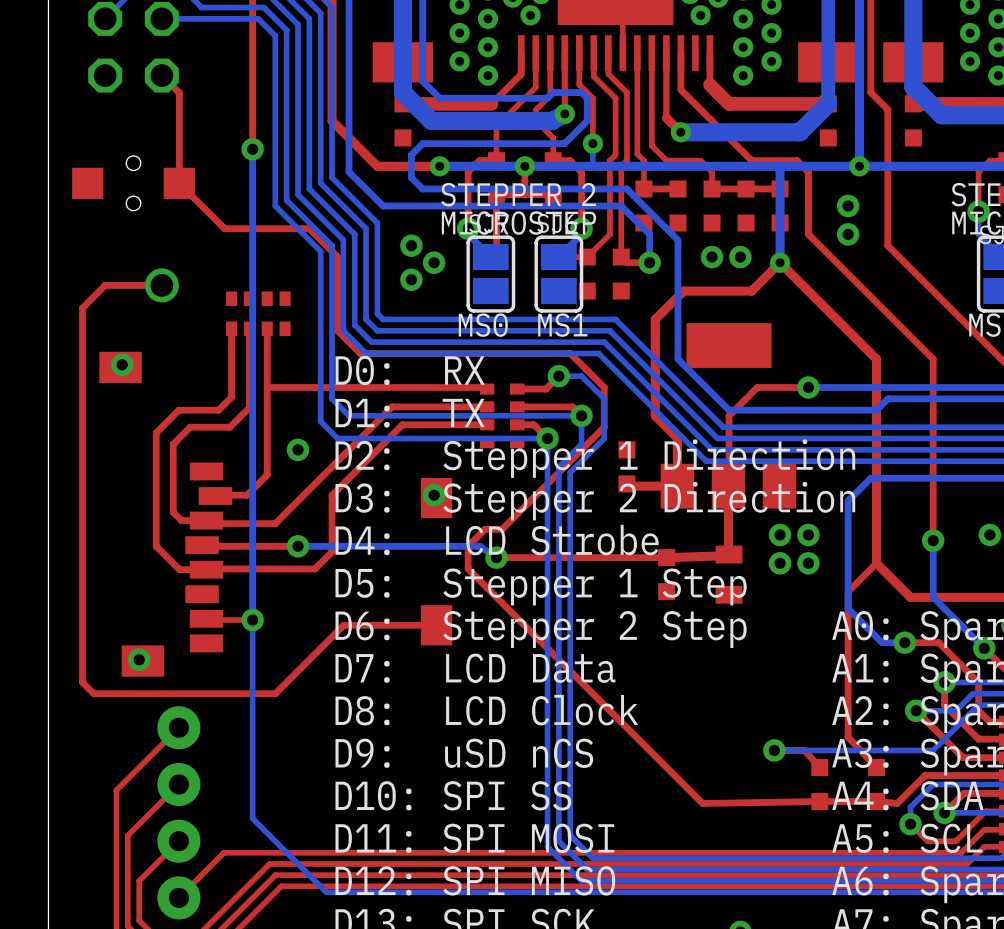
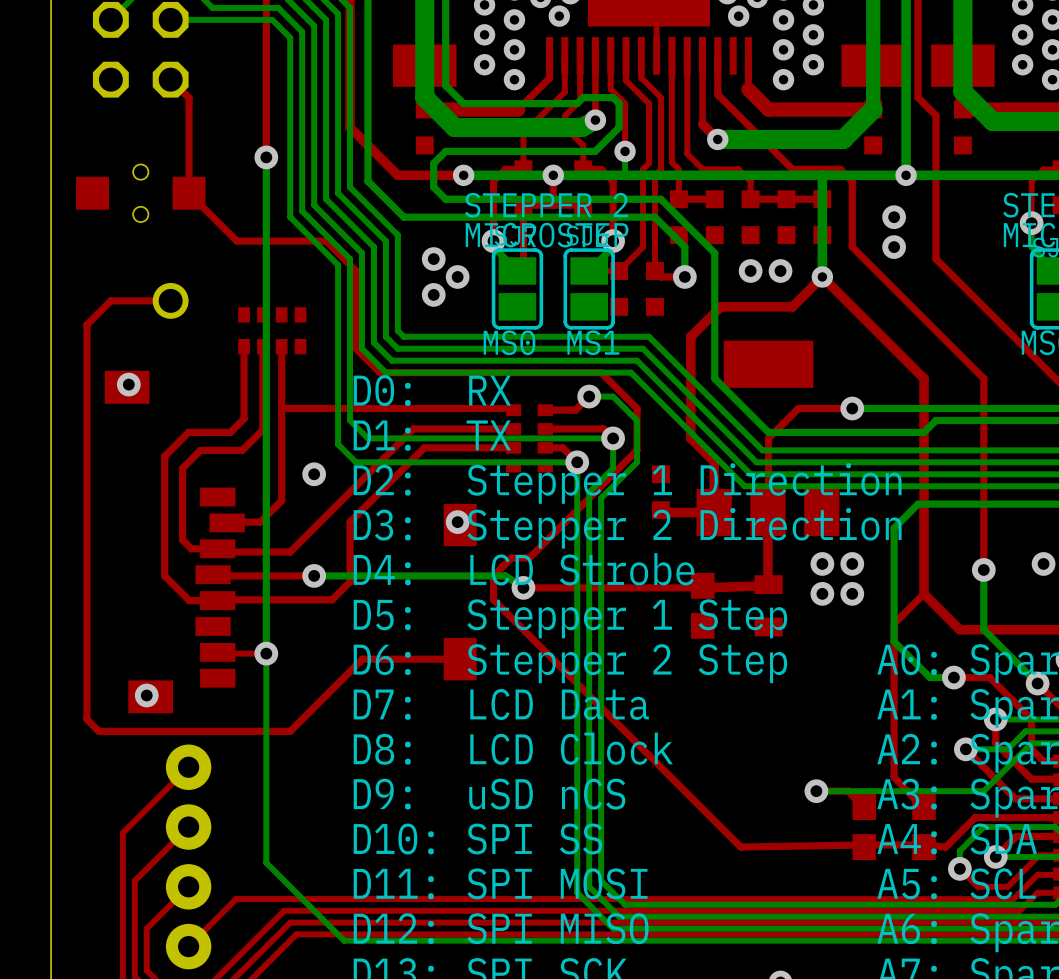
part footprint: [658, 549, 676, 601] -> [691, 572, 715, 639]
part footprint: [811, 758, 829, 811] -> [852, 794, 876, 860]
part footprint: [867, 758, 885, 811] -> [912, 794, 936, 860]

